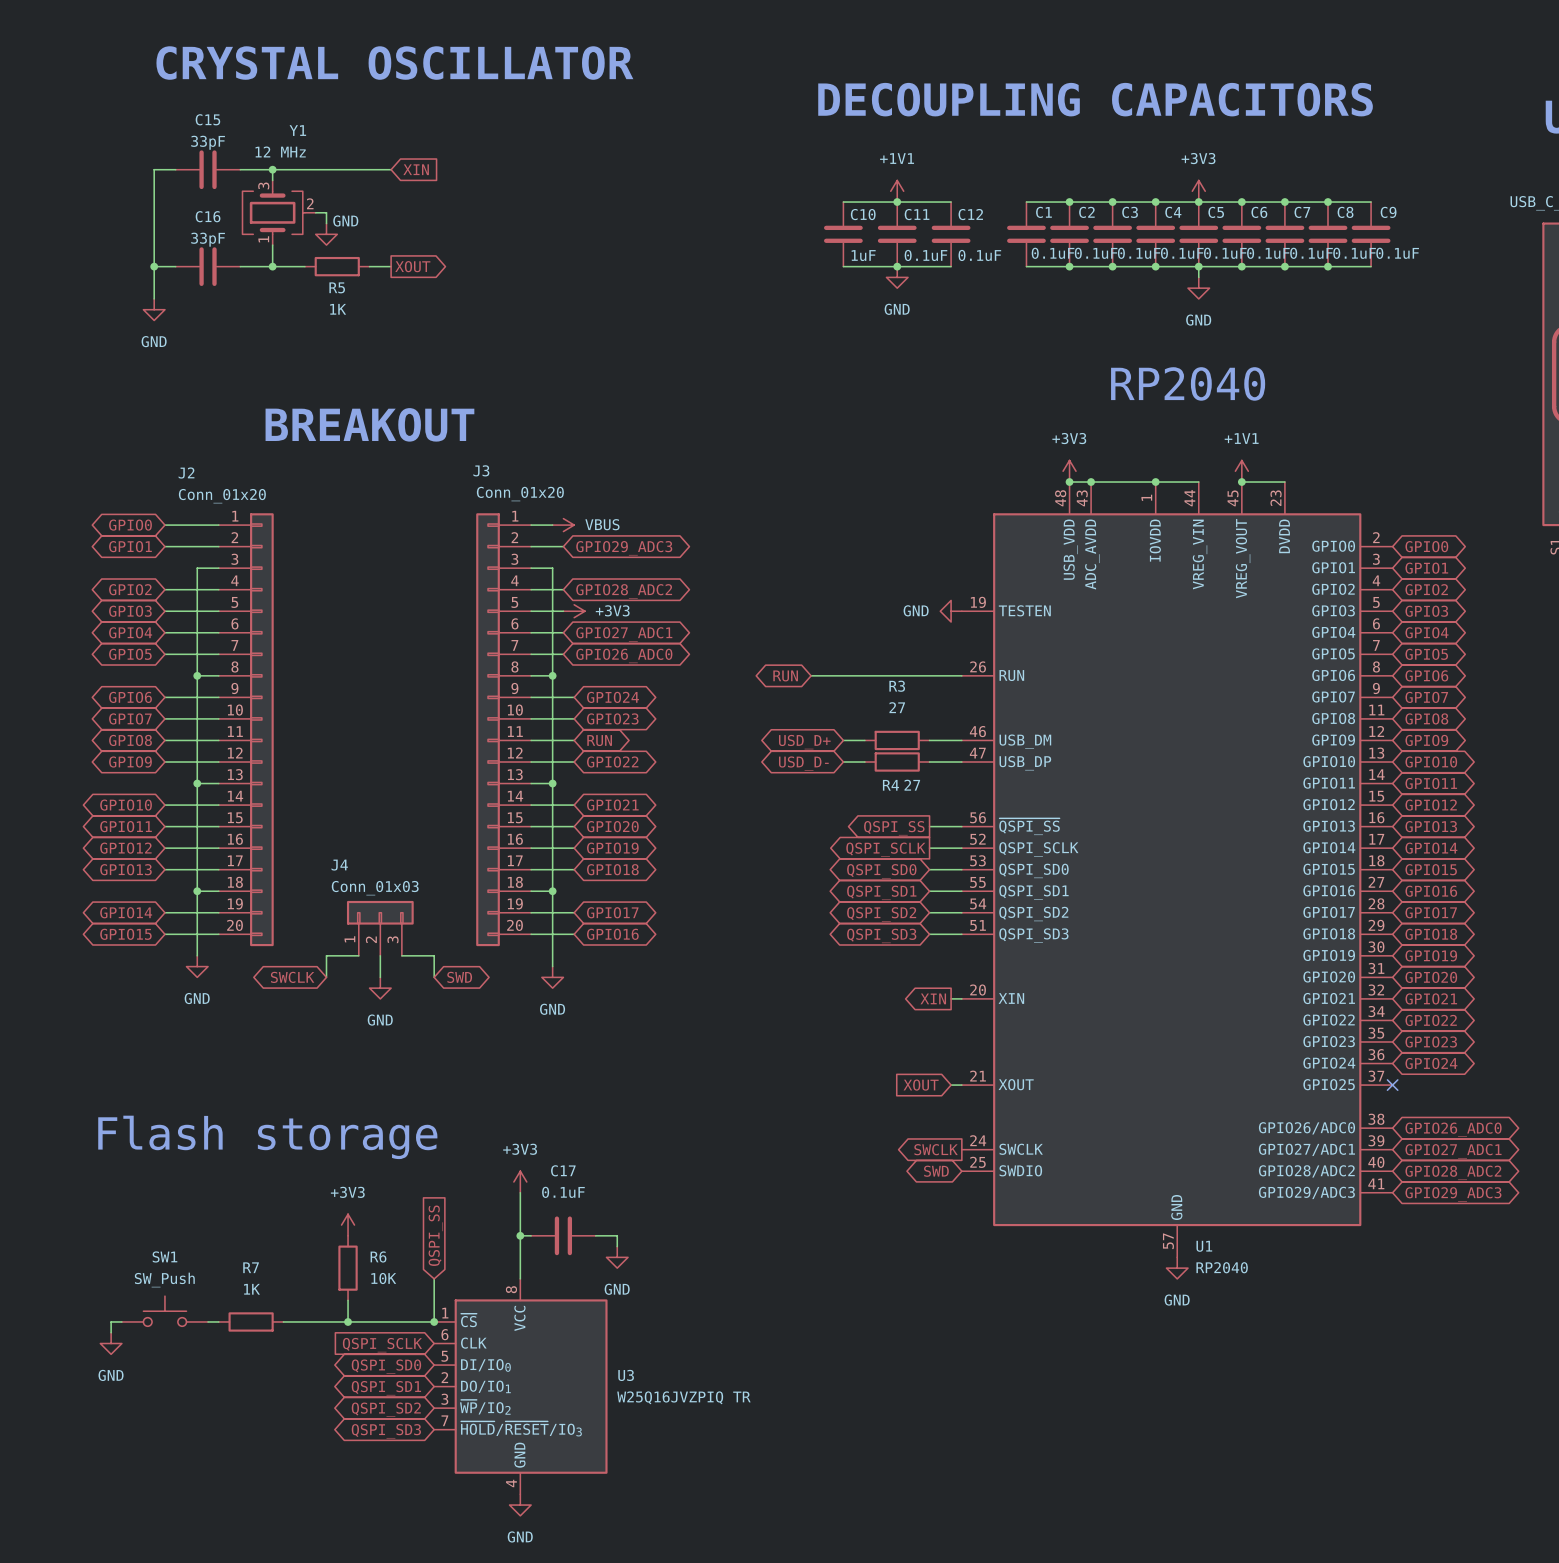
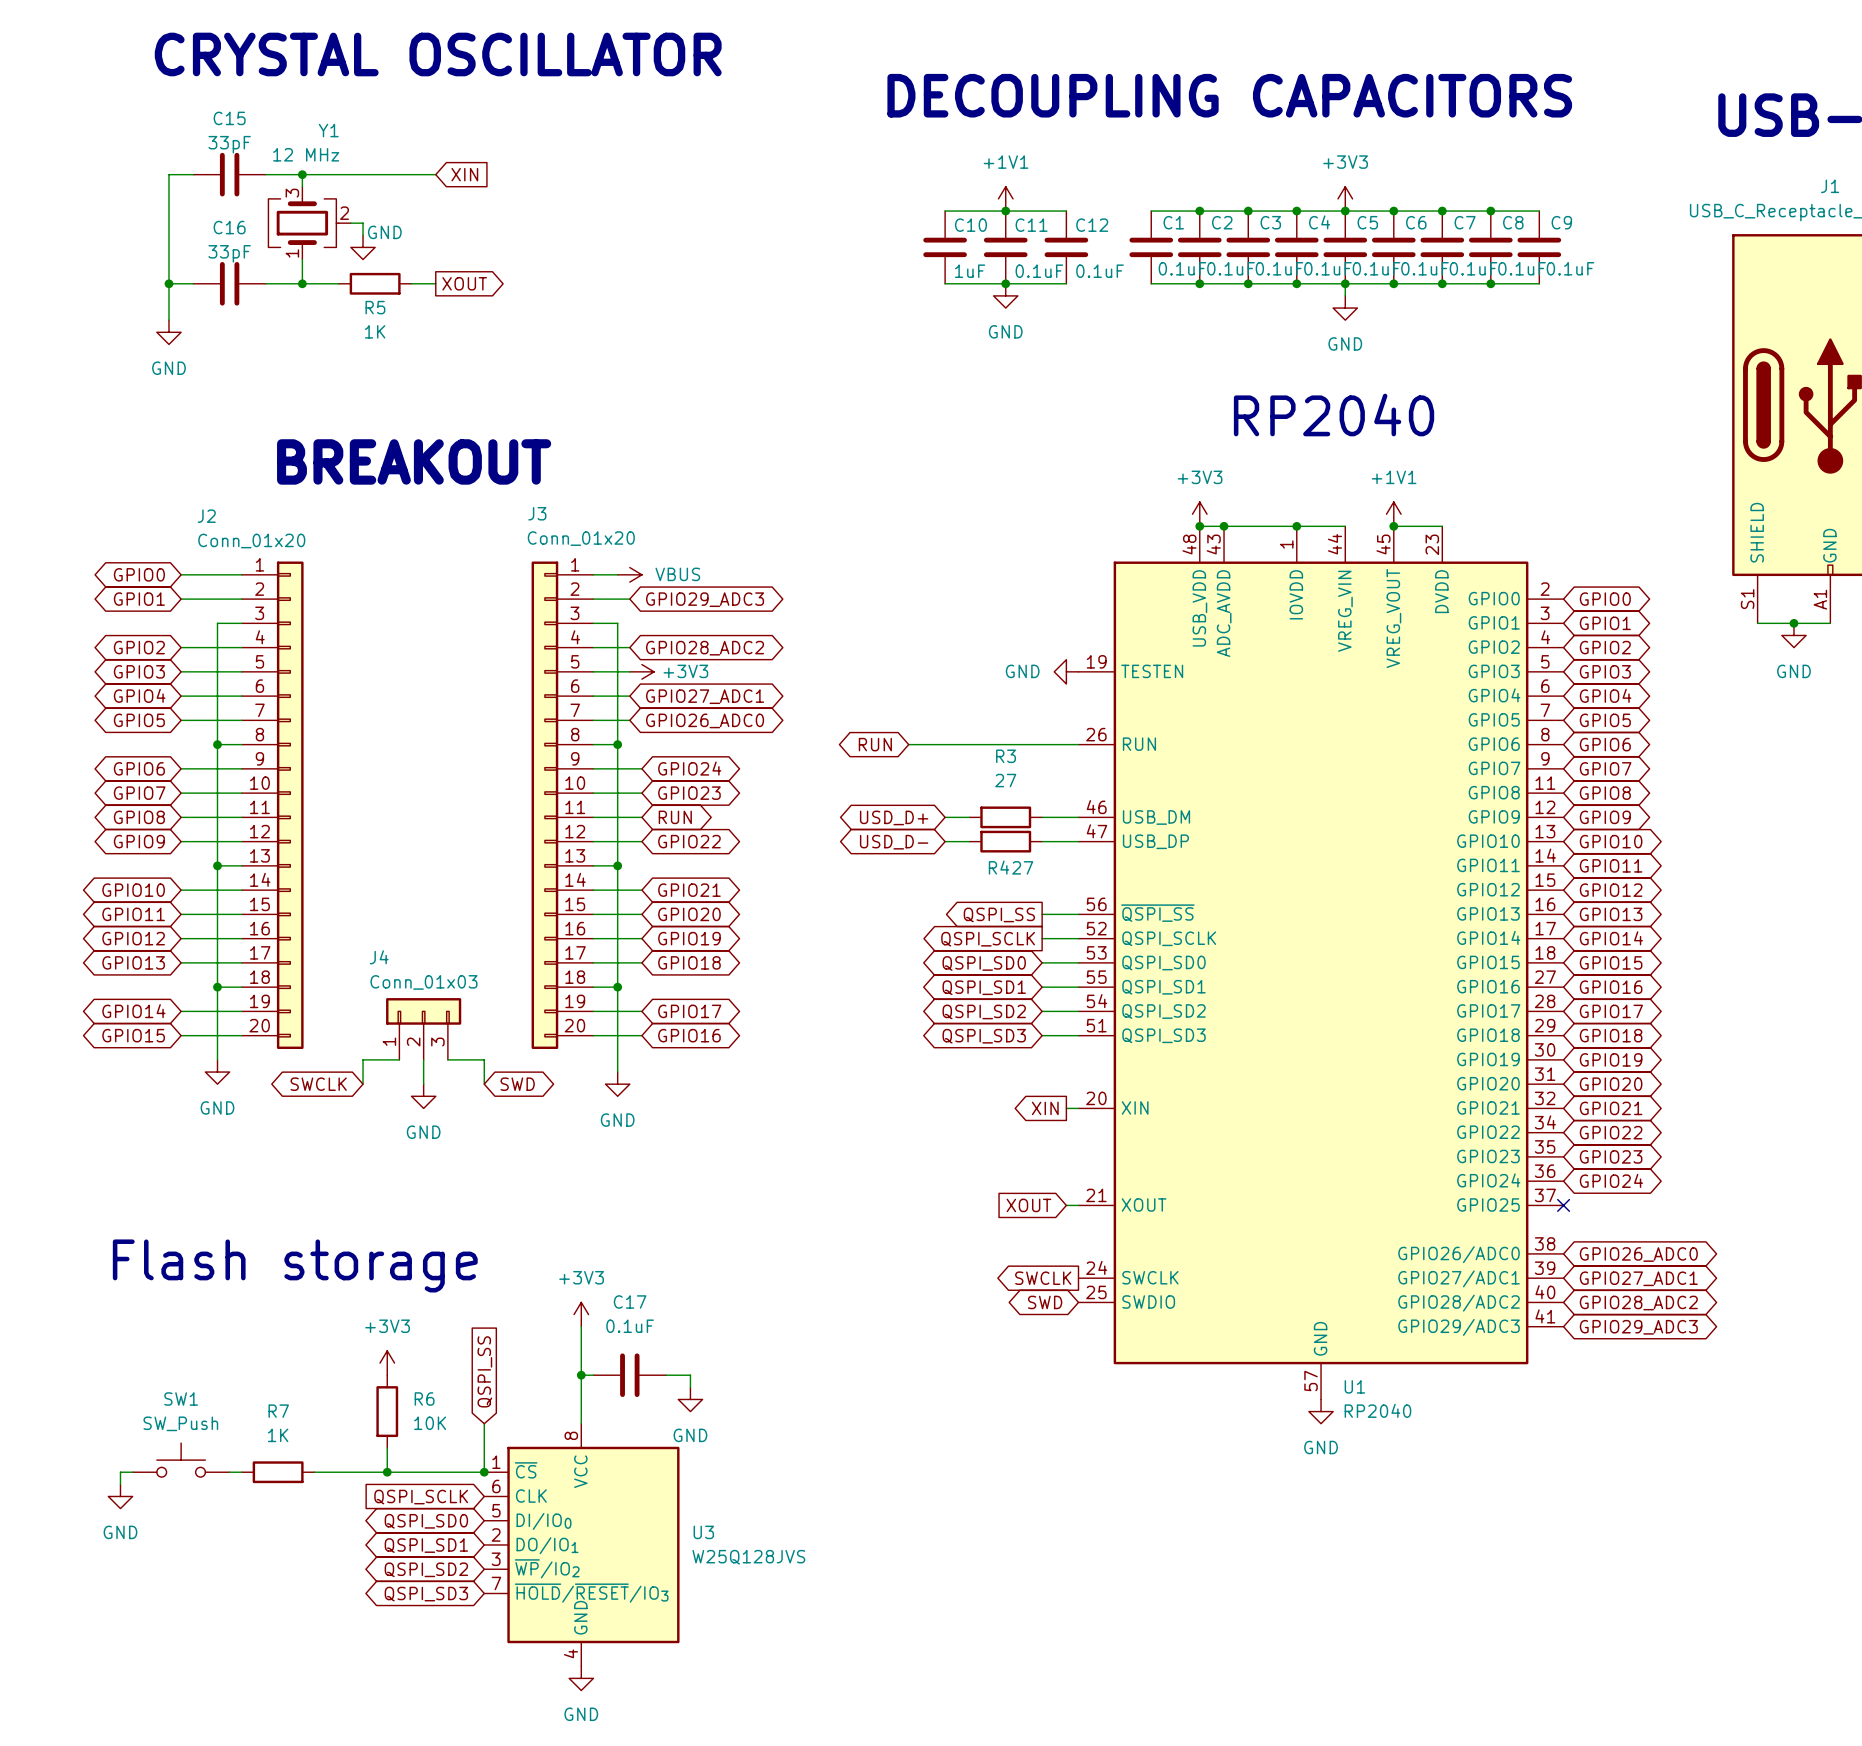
U3 value: W25Q16JVZPIQ TR (683, 1397) -> W25Q128JVS (748, 1557)

